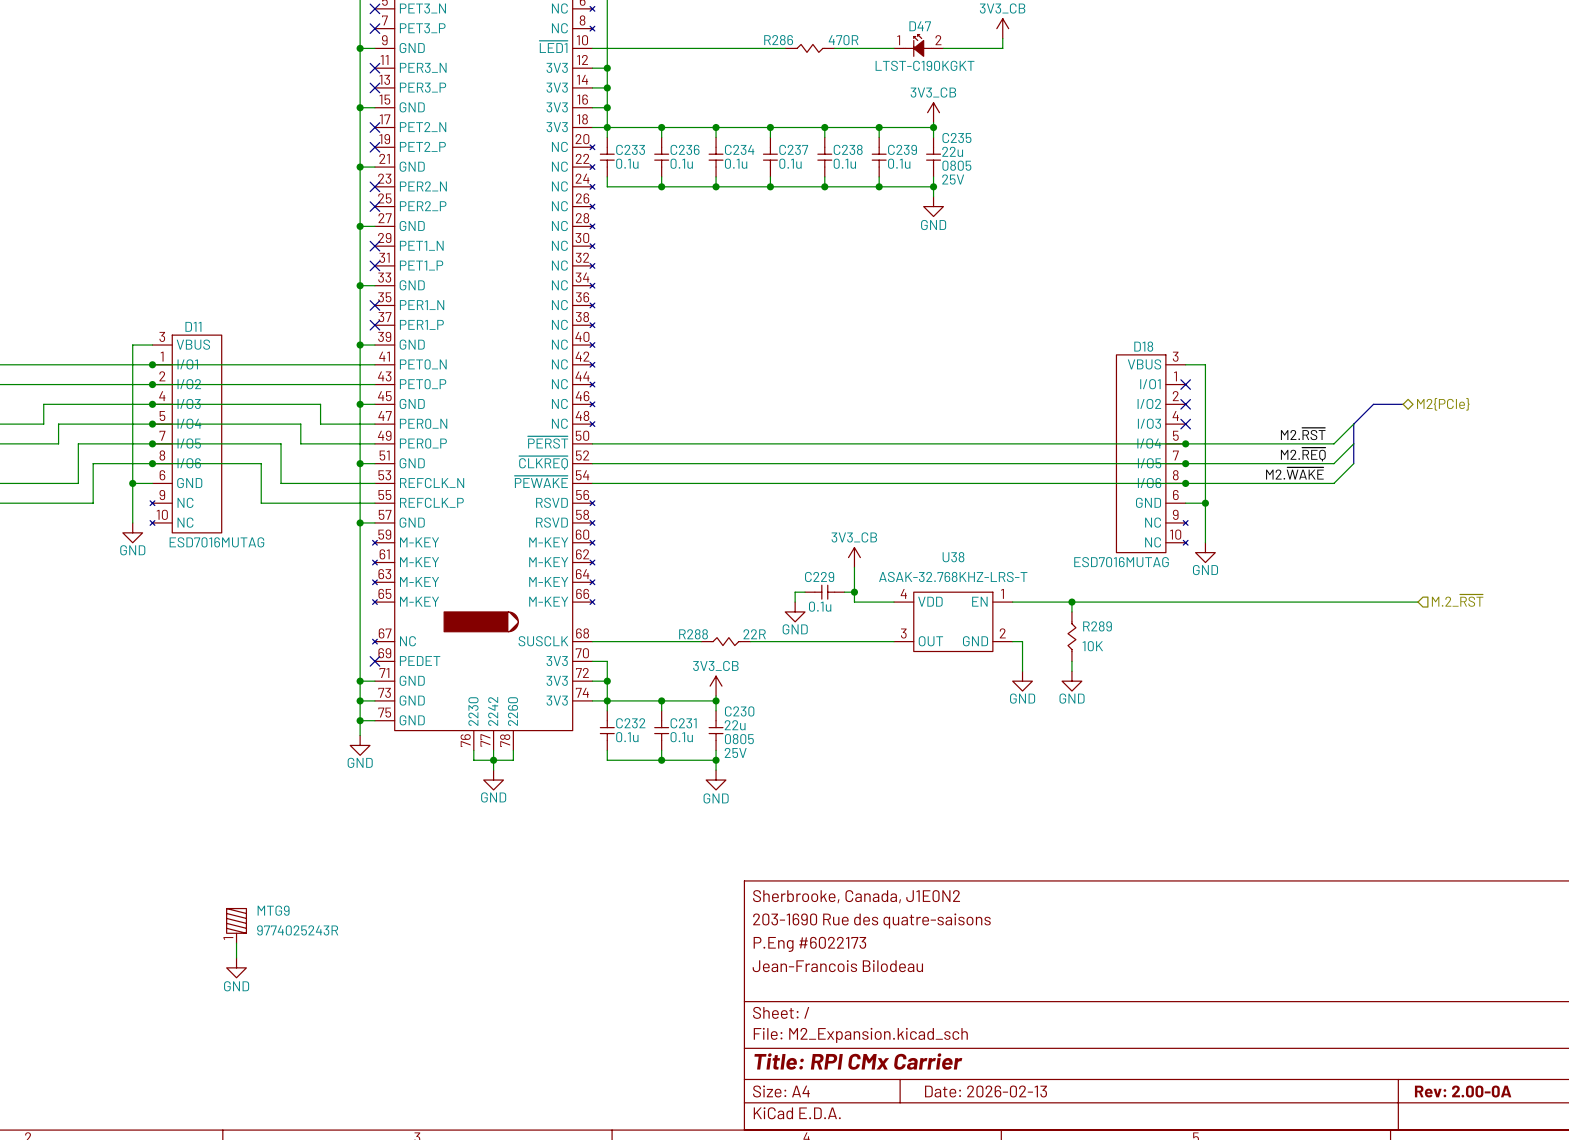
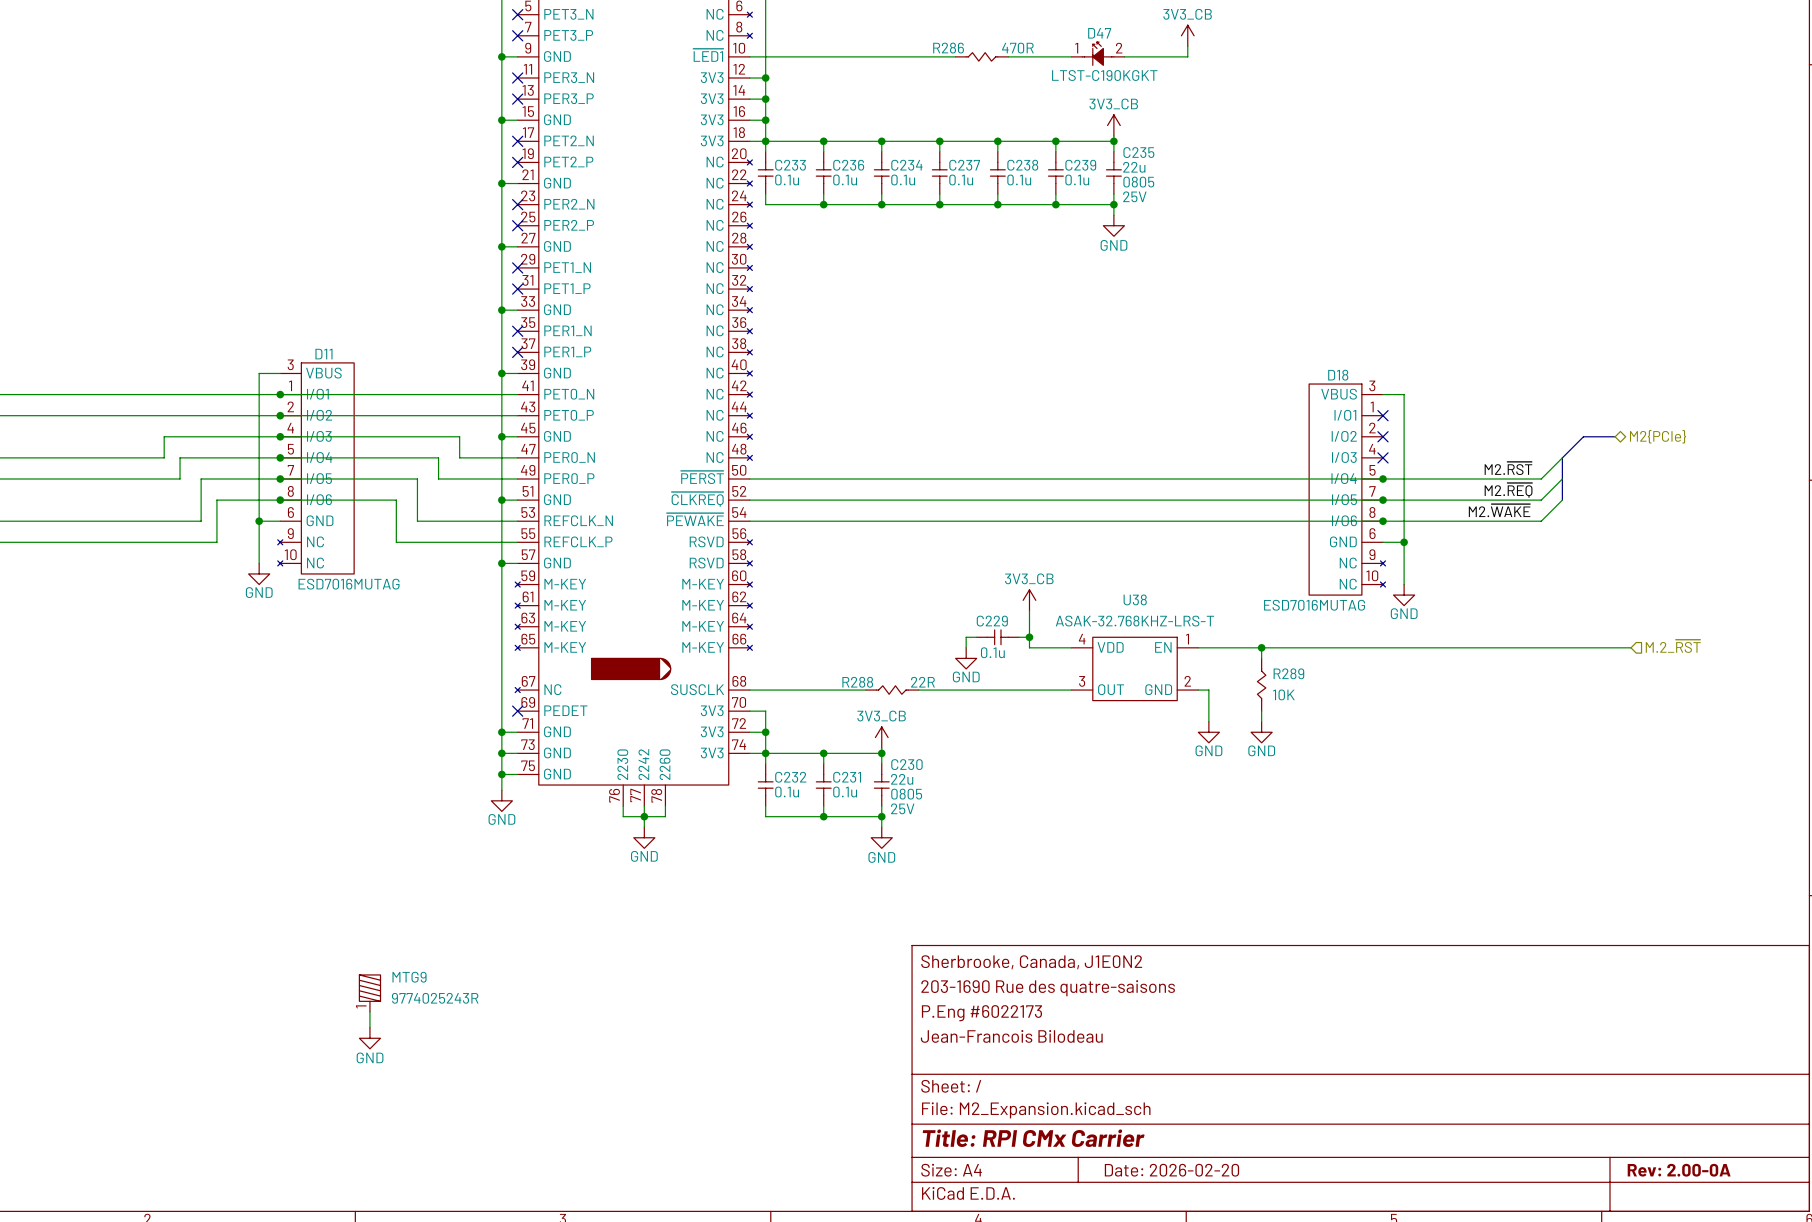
title block: Date: 2026-02-13 (986, 1091) -> Date: 2026-02-20 (1171, 1170)

